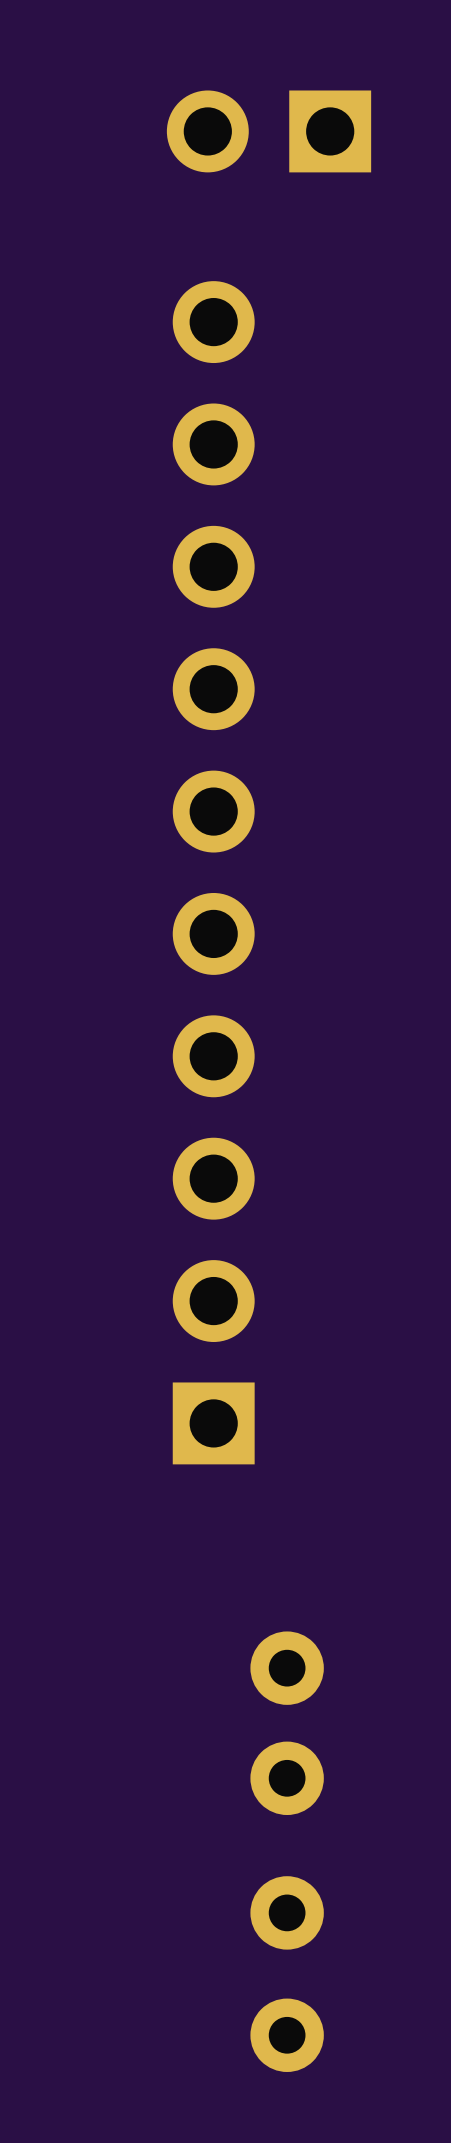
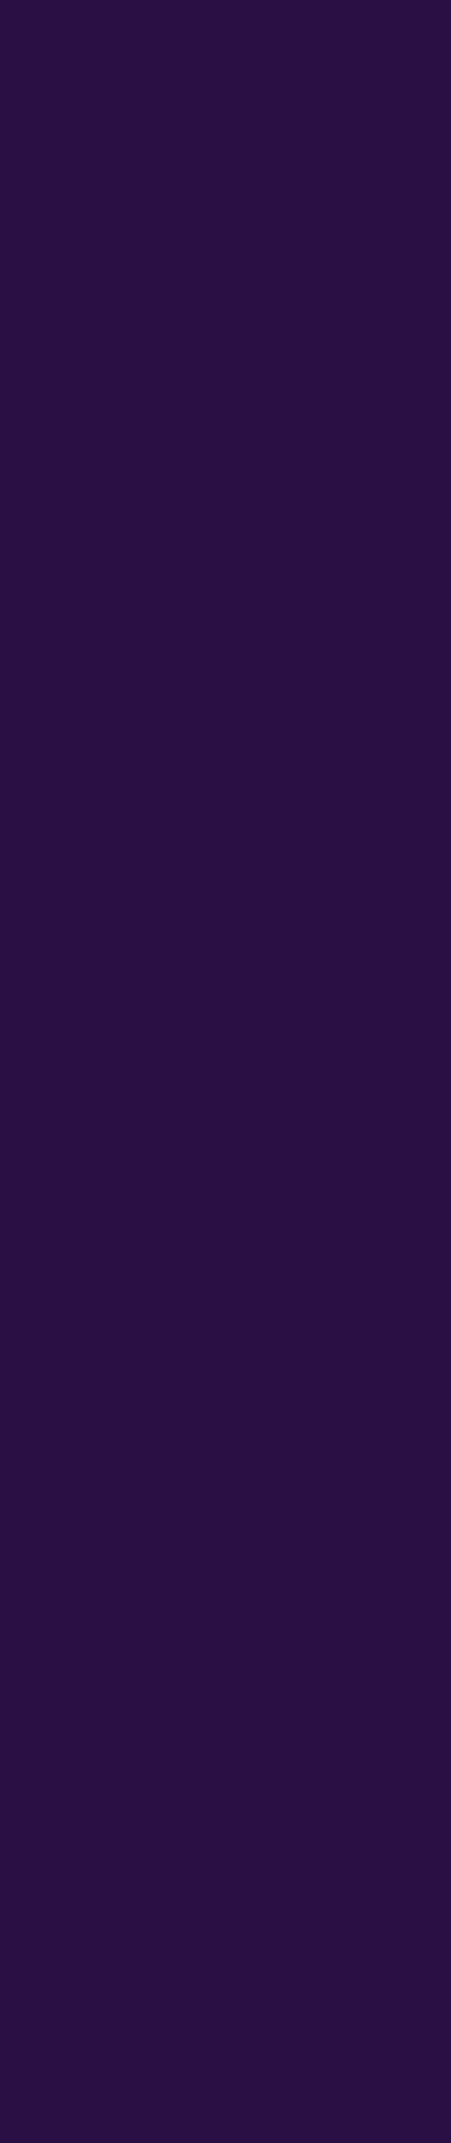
part: (269, 131) -> none
part: (213, 872) -> none
part: (287, 1851) -> none

